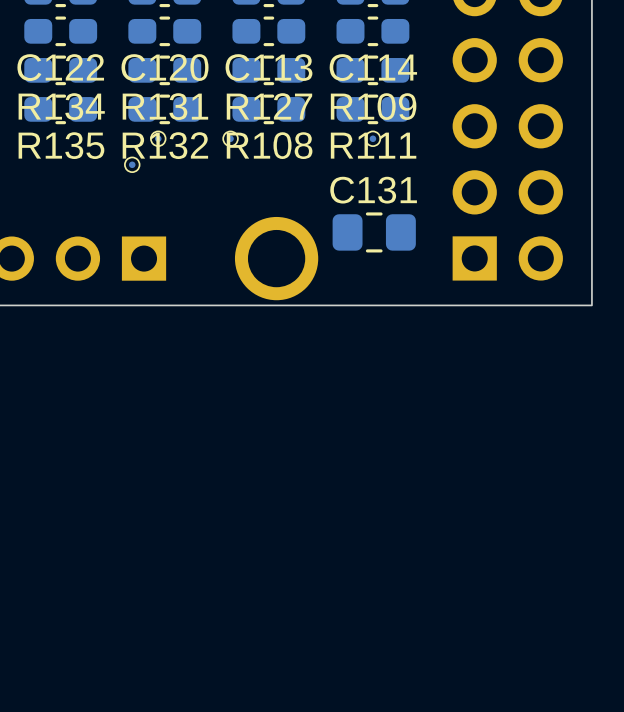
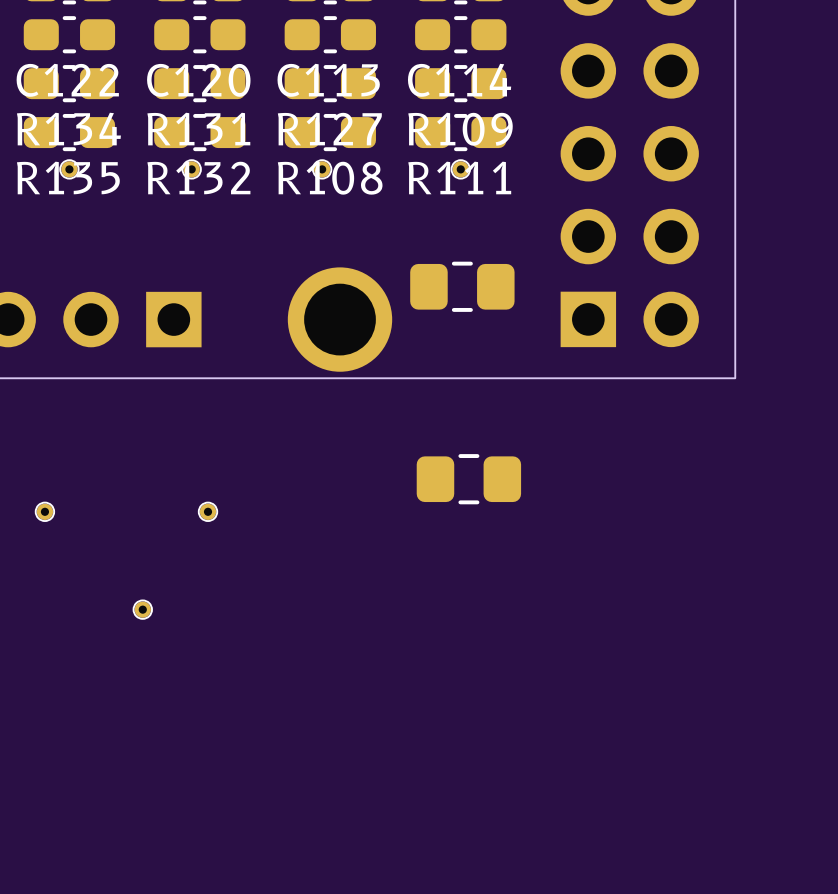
part footprint: [150, 131, 166, 147] -> [182, 160, 201, 179]
part footprint: [365, 131, 381, 147] -> [451, 160, 471, 179]
part: none -> (69, 169)
part: (230, 138) -> none
part: none -> (322, 169)
part: (132, 164) -> none
C131 name: C131 (373, 190) -> none
part: none -> (468, 479)
part: none -> (44, 511)
part: none -> (208, 511)
part: none -> (142, 609)

